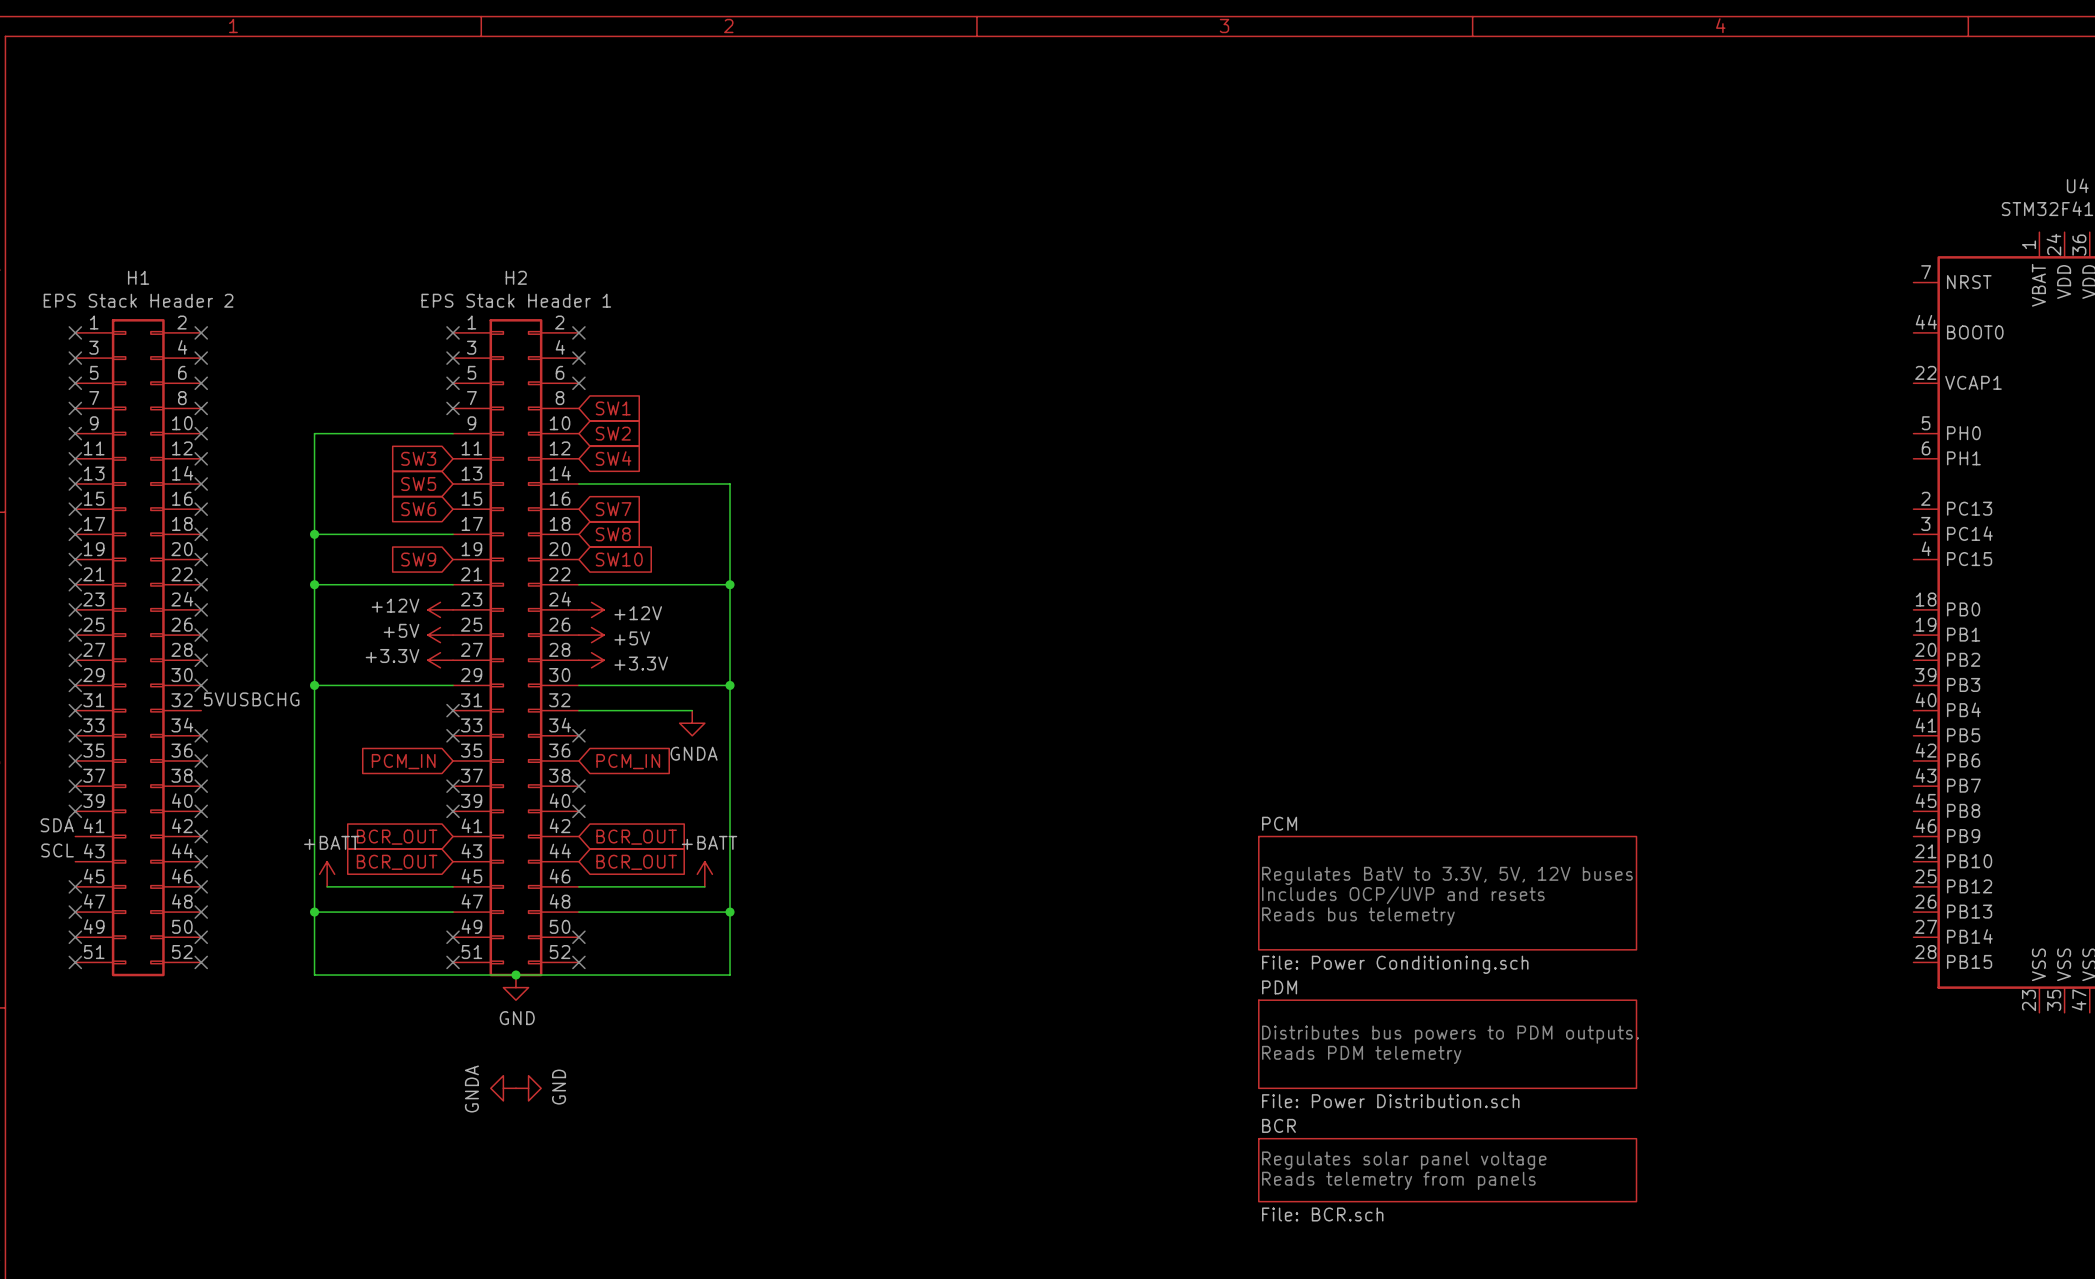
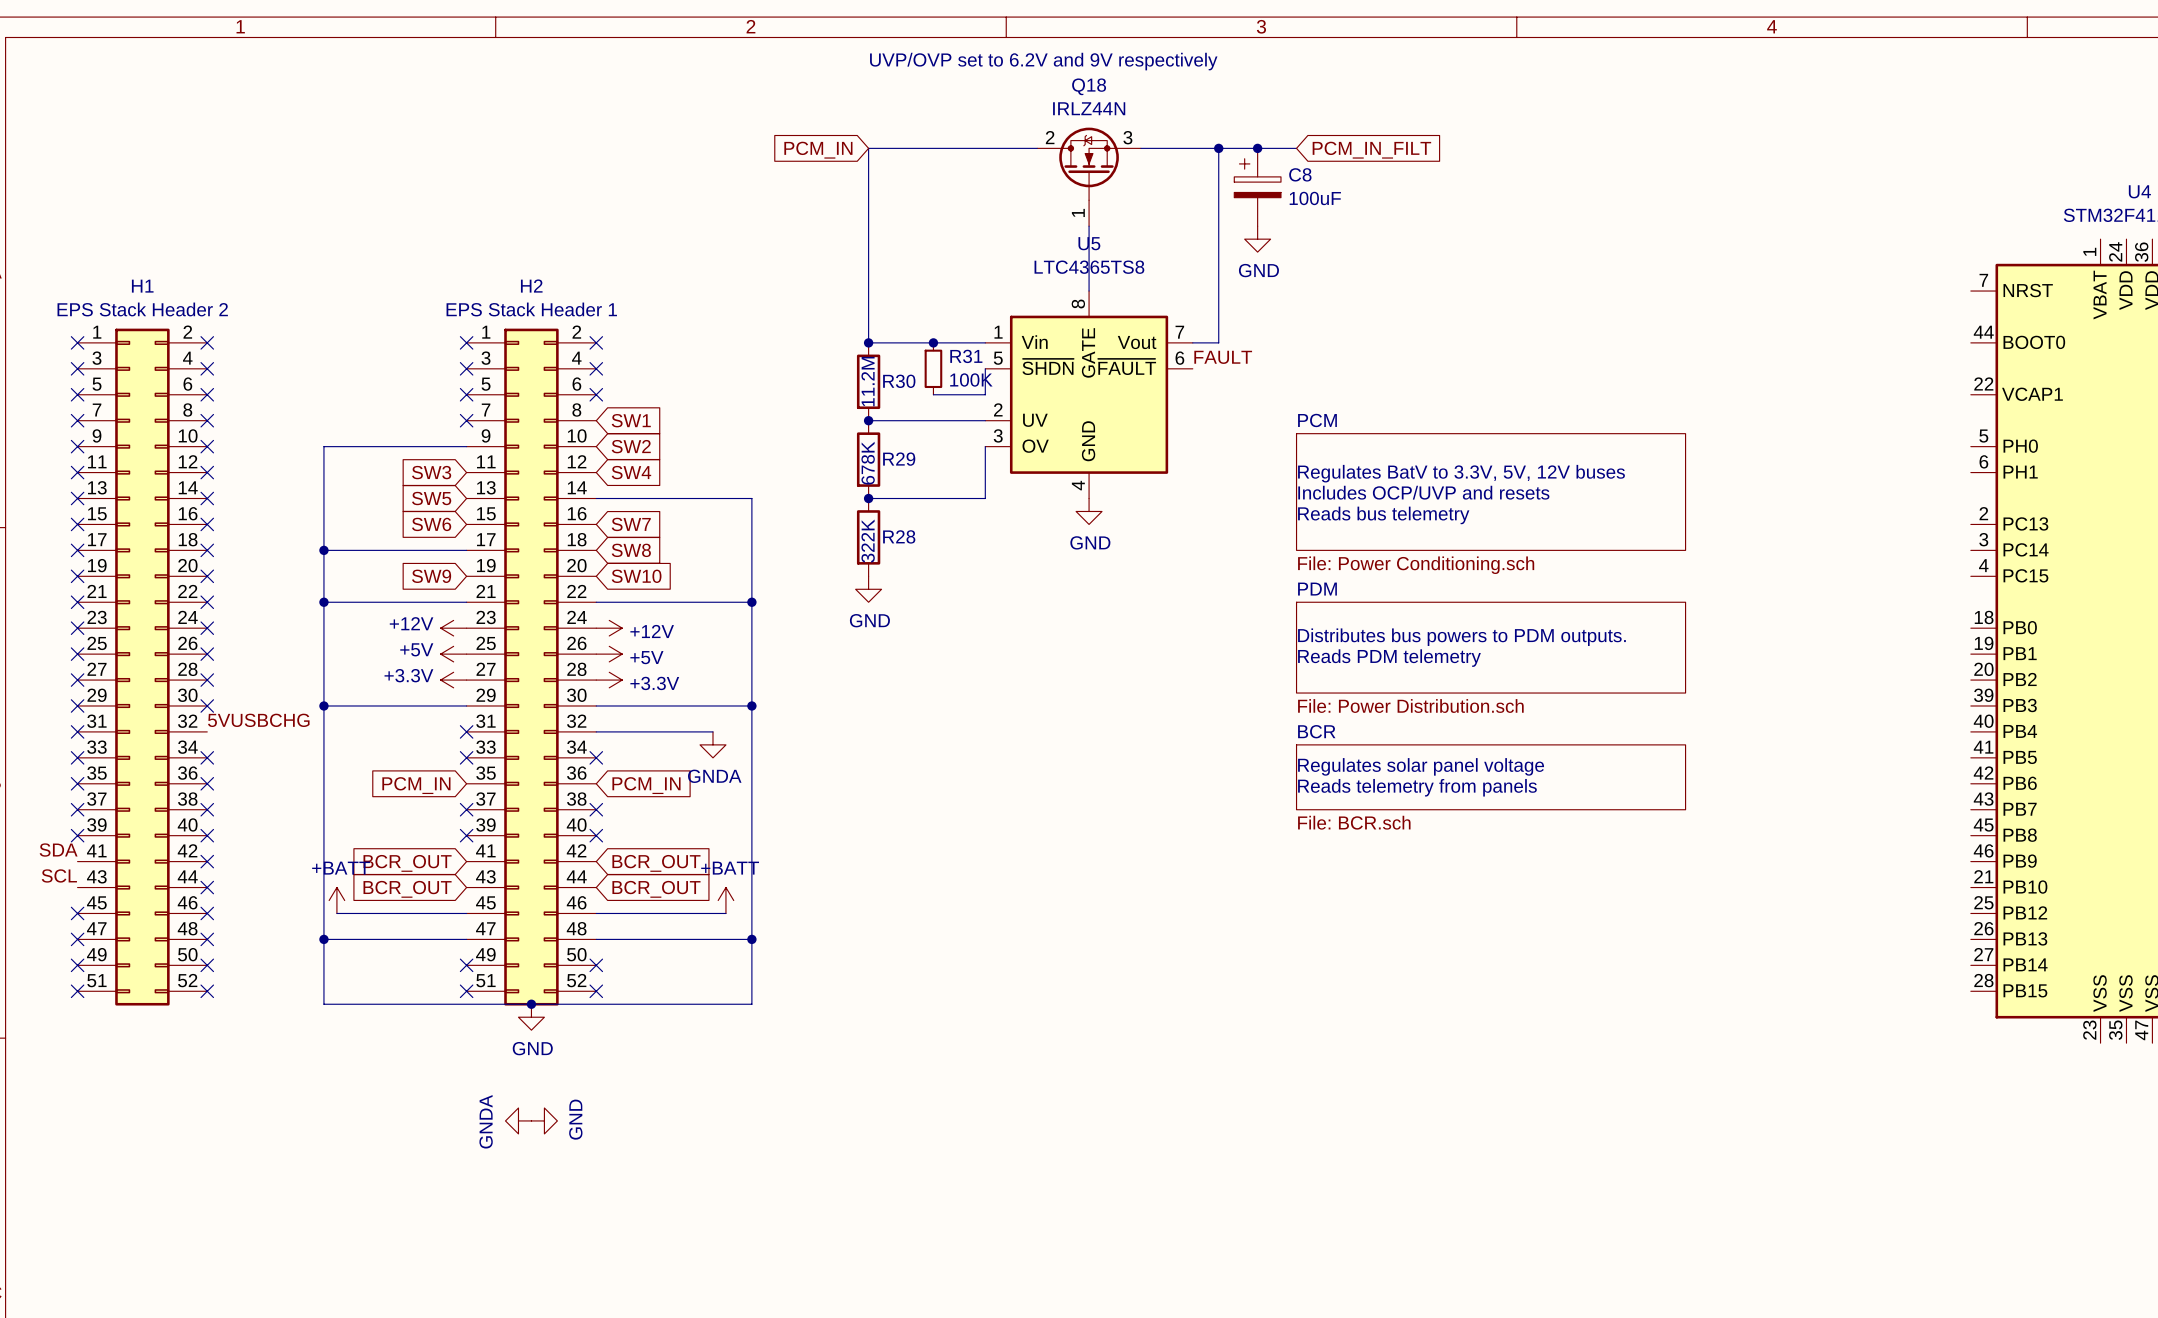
text: none -> UVP/OVP set to 6.2V and 9V respectively (1043, 61)
global label: none -> PCM_IN (818, 150)
wire: none -> (1037, 148) (868, 148) (868, 342) (985, 342)
wire: none -> (1140, 148) (1296, 148)
wire: none -> (1218, 148) (1218, 342) (1192, 342)
junction: none -> (1218, 148)
junction: none -> (1257, 148)
global label: none -> PCM_IN_FILT (1371, 150)
Q18: none -> IRLZ44N (1089, 176)
C8: none -> 100uF (1257, 187)
wire: none -> (1089, 226) (1089, 291)
power symbol: none -> GND (1257, 239)
junction: none -> (868, 342)
junction: none -> (933, 342)
label: none -> FAULT (1223, 357)
R31: none -> 100K (933, 368)
wire: none -> (985, 368) (985, 394) (933, 394)
R30: none -> 11.2M (868, 381)
U5: none -> LTC4365TS8 (1089, 394)
wire: none -> (868, 420) (985, 420)
junction: none -> (868, 420)
wire: none -> (985, 446) (985, 498) (868, 498)
R29: none -> 678K (868, 459)
text: none -> Regulates BatV to 3.3V, 5V, 12V buses (1461, 473)
sheet PCM: none -> File: Power Conditioning.sch (1491, 492)
text: none -> Includes OCP/UVP and resets (1423, 492)
junction: none -> (868, 498)
power symbol: none -> GND (1089, 511)
text: none -> Reads bus telemetry (1383, 515)
R28: none -> 322K (868, 537)
power symbol: none -> GND (868, 589)
text: none -> Distributes bus powers to PDM outputs. (1461, 637)
sheet PDM: none -> File: Power Distribution.sch (1491, 647)
text: none -> Reads PDM telemetry (1389, 658)
text: none -> Regulates solar panel voltage (1421, 766)
sheet BCR: none -> File: BCR.sch (1491, 777)
text: none -> Reads telemetry from panels (1417, 787)
text: Regulates BatV to 3.3V, 5V, 12V buses (1447, 875) -> none
sheet PCM: File: Power Conditioning.sch (1447, 893) -> none
text: Includes OCP/UVP and resets (1403, 895) -> none
text: Reads bus telemetry (1358, 916) -> none
text: Distributes bus powers to PDM outputs. (1450, 1034) -> none
sheet PDM: File: Power Distribution.sch (1447, 1044) -> none
text: Reads PDM telemetry (1361, 1054) -> none
text: Regulates solar panel voltage (1404, 1160) -> none
sheet BCR: File: BCR.sch (1447, 1170) -> none
text: Reads telemetry from panels (1398, 1180) -> none

